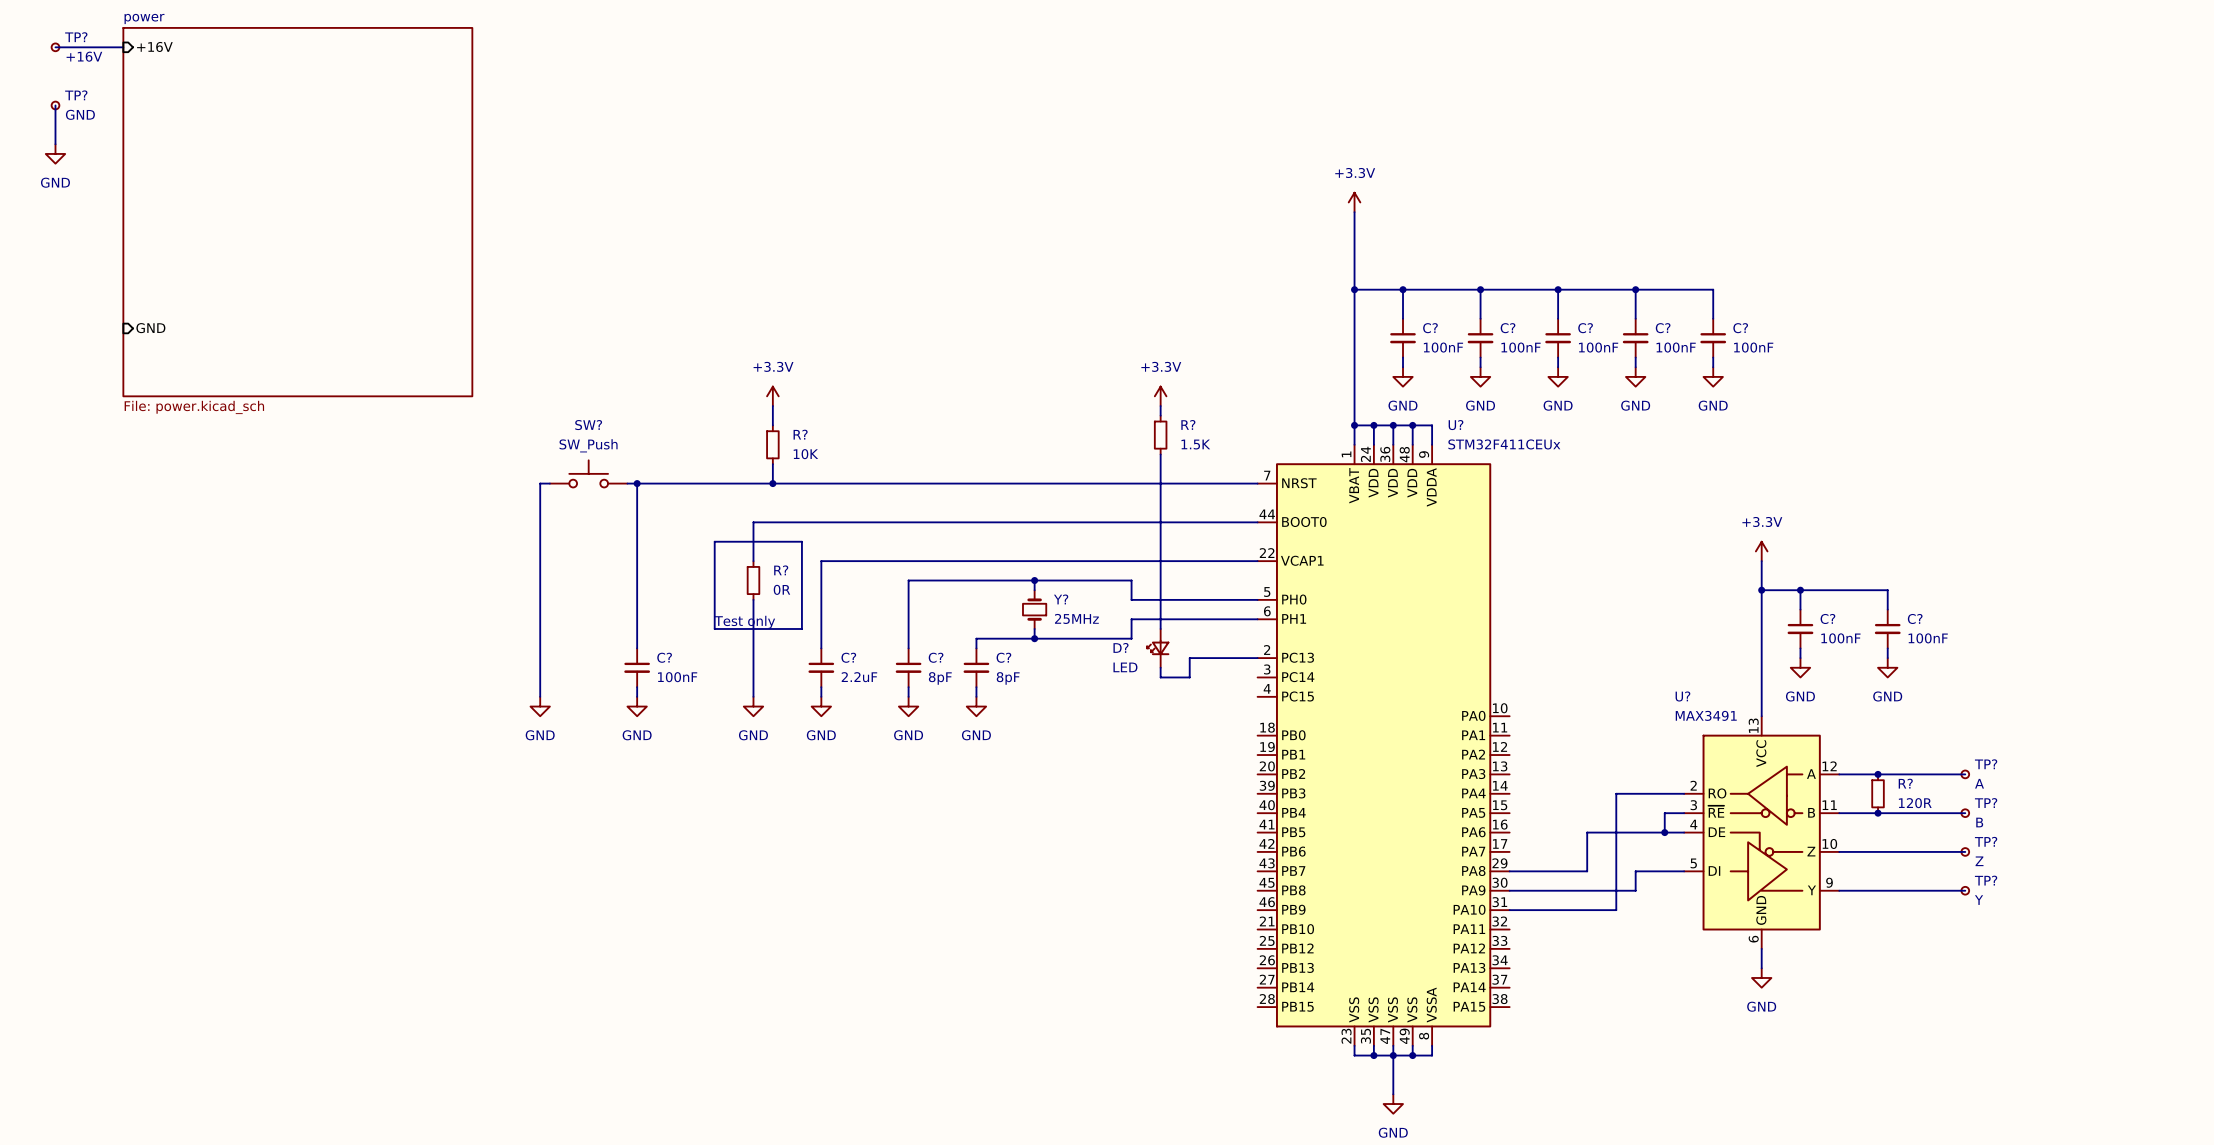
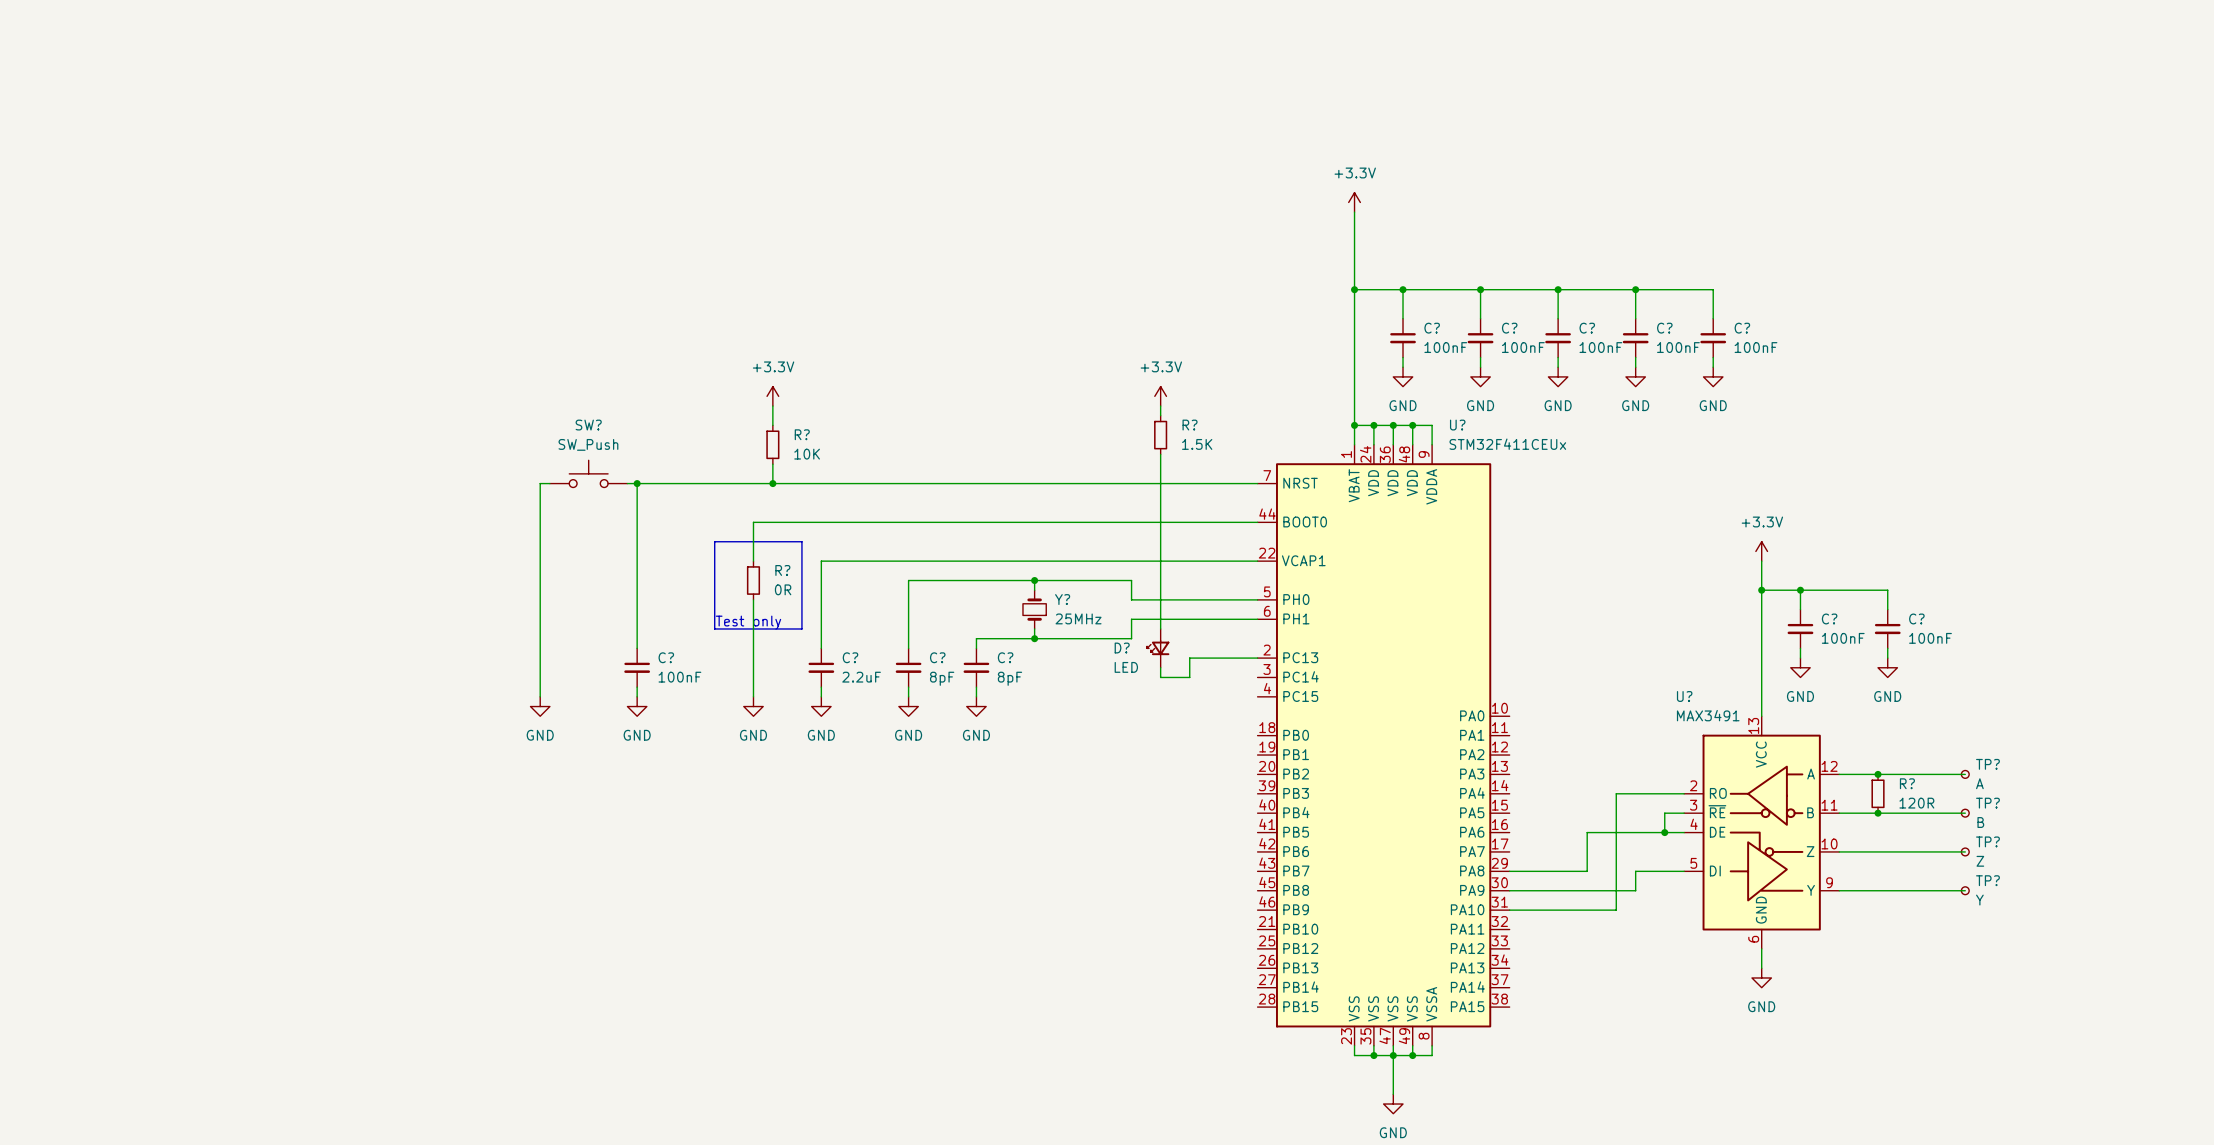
sheet pin: +16V (154, 46) -> none
wire: (55, 47) (123, 47) -> none
TP?: +16V (55, 47) -> none
wire: (55, 105) (55, 144) -> none
TP?: GND (55, 105) -> none
power symbol: GND (55, 153) -> none
sheet power: File: power.kicad_sch (297, 212) -> none
sheet pin: GND (150, 328) -> none

